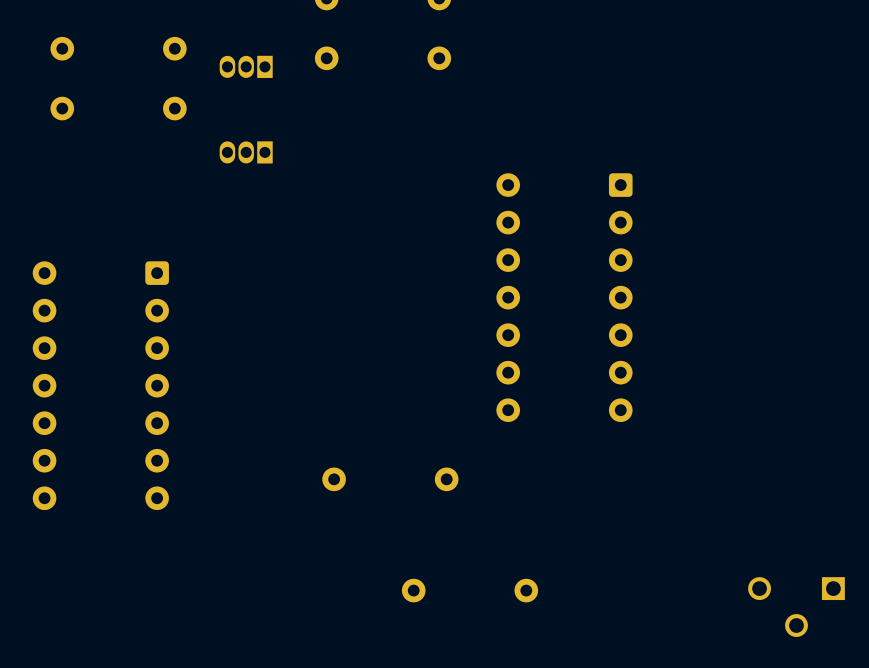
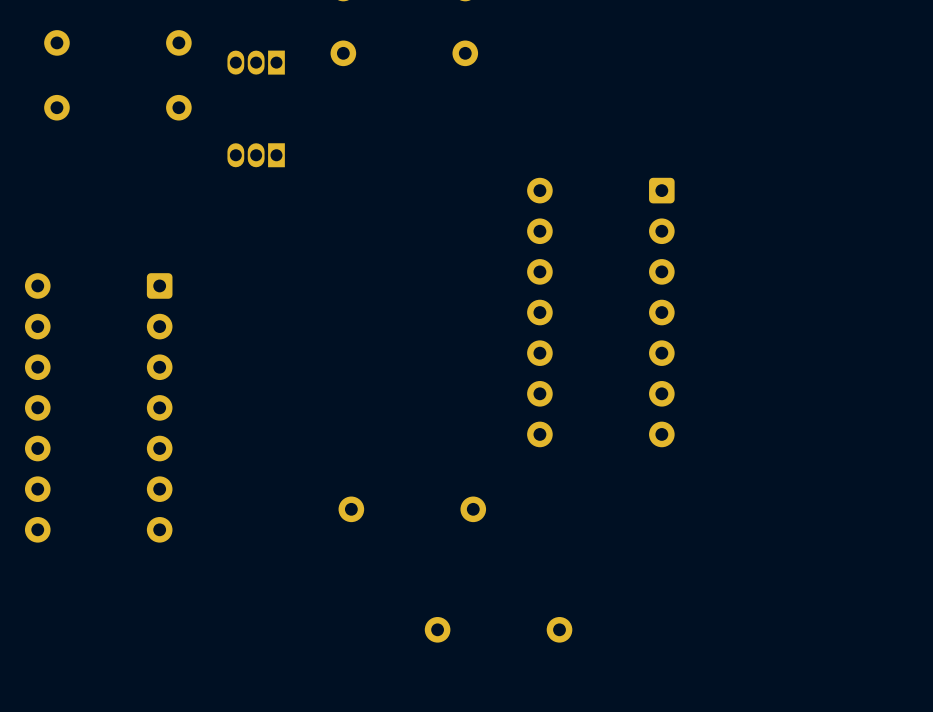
part: (796, 607) -> none

